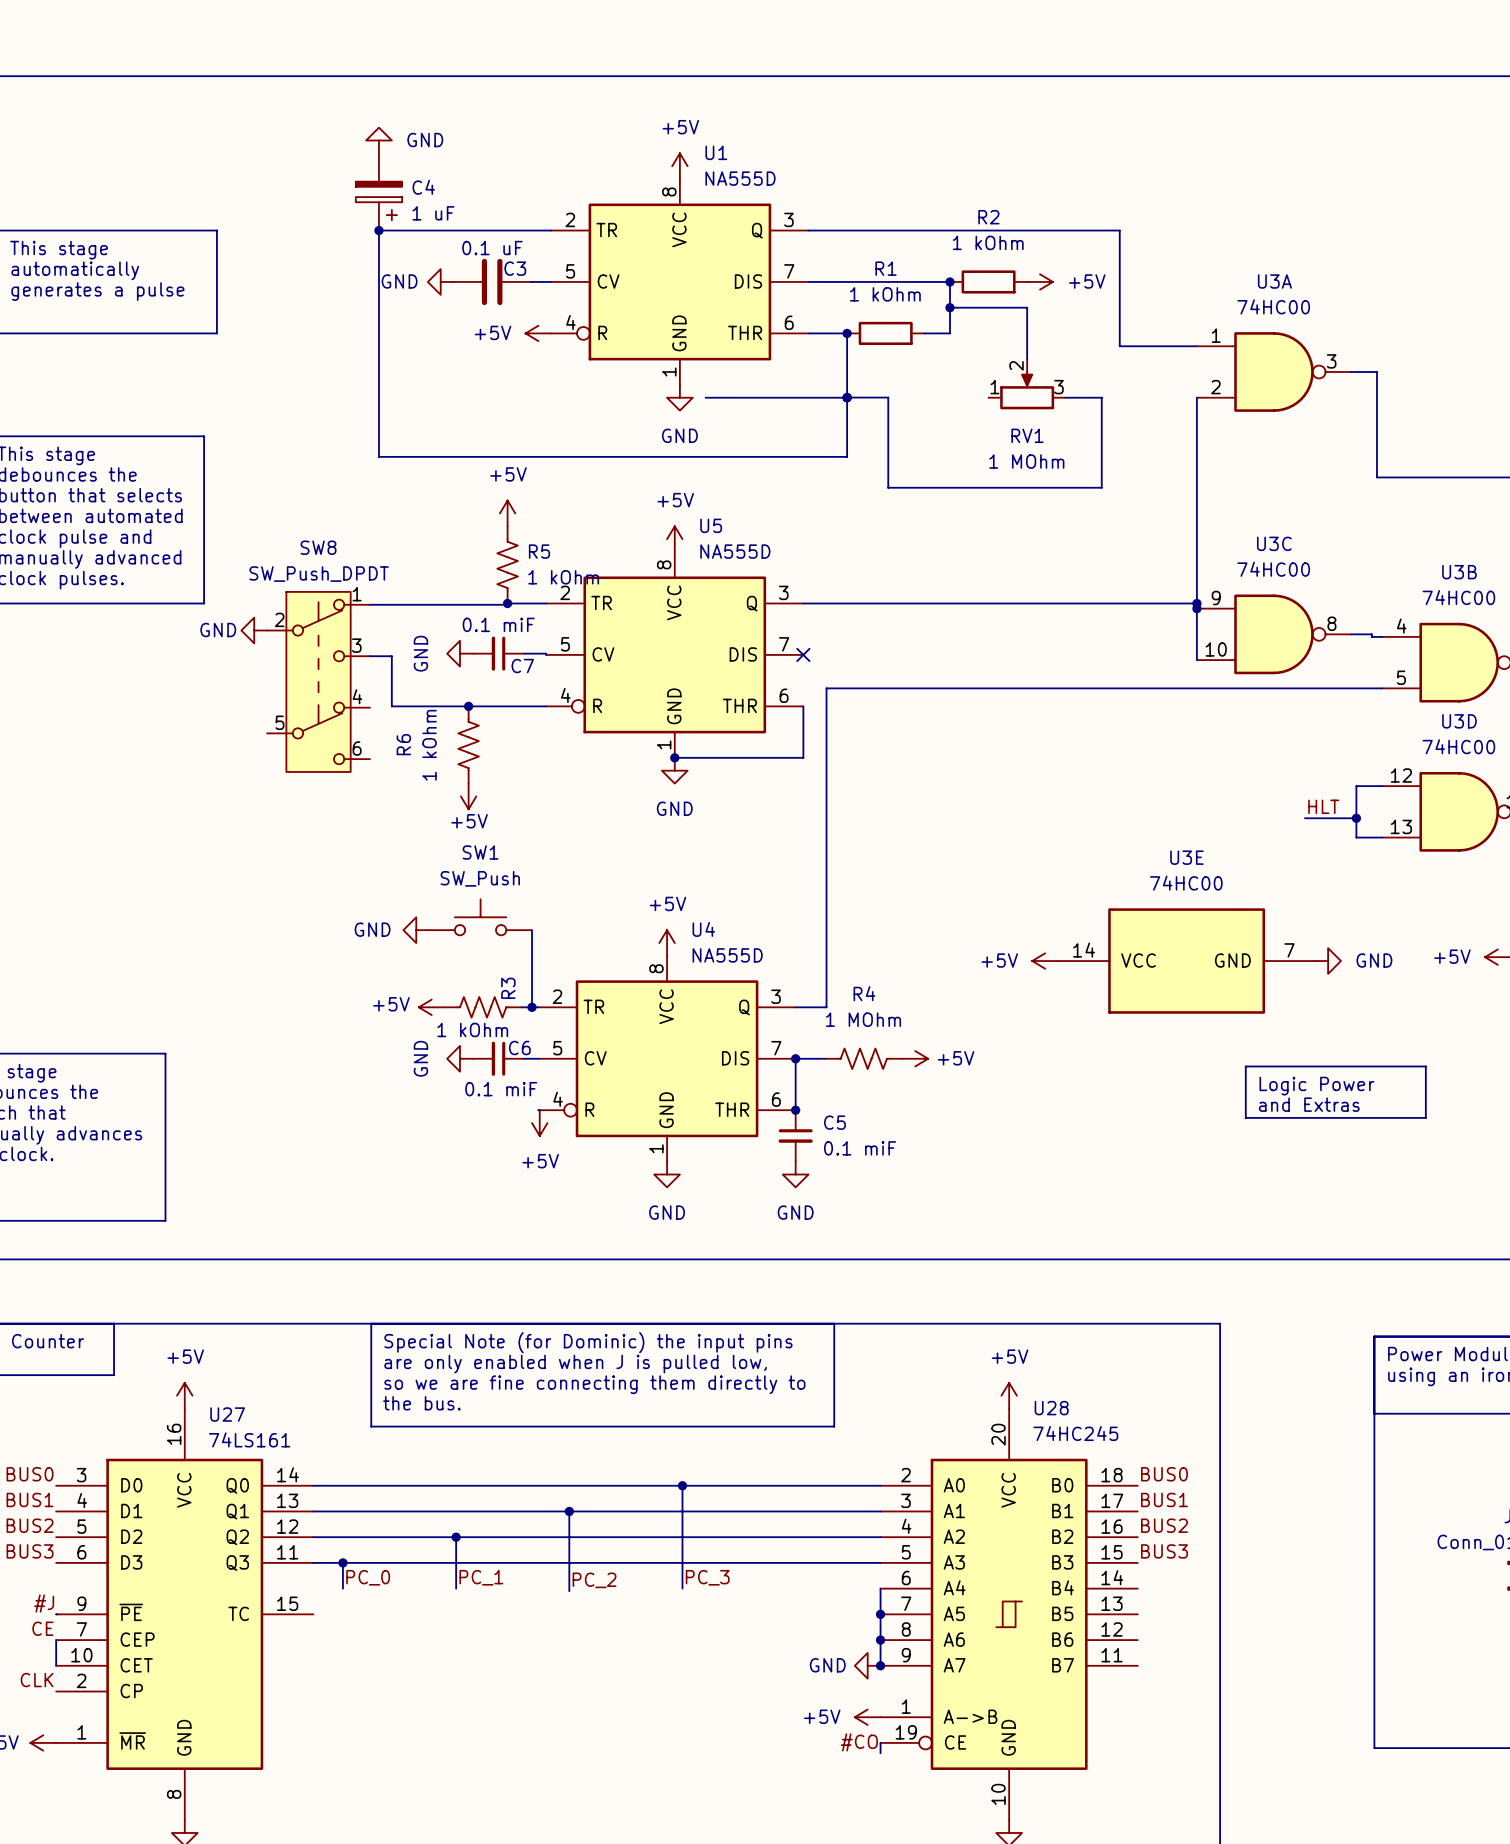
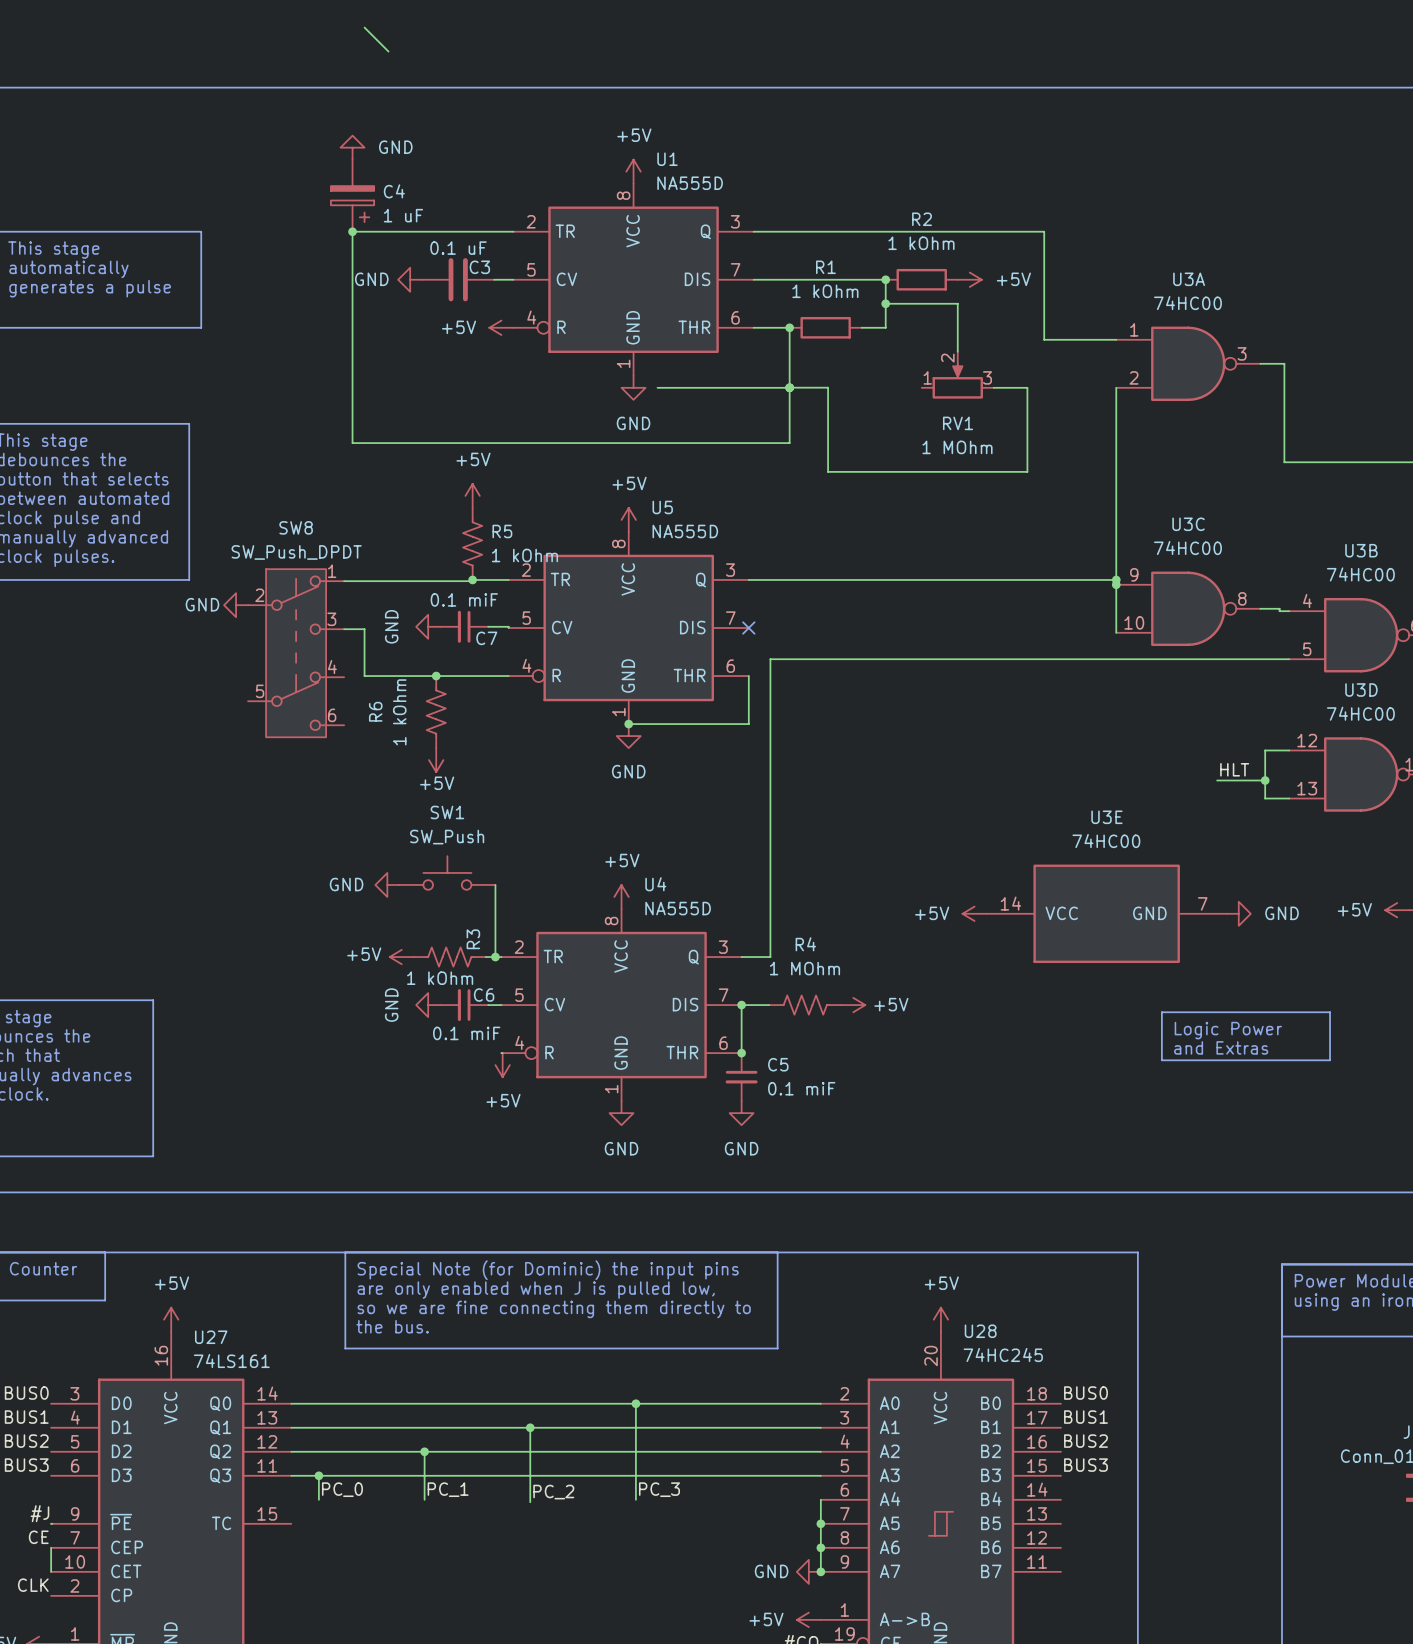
wire: none -> (364, 27) (388, 51)

